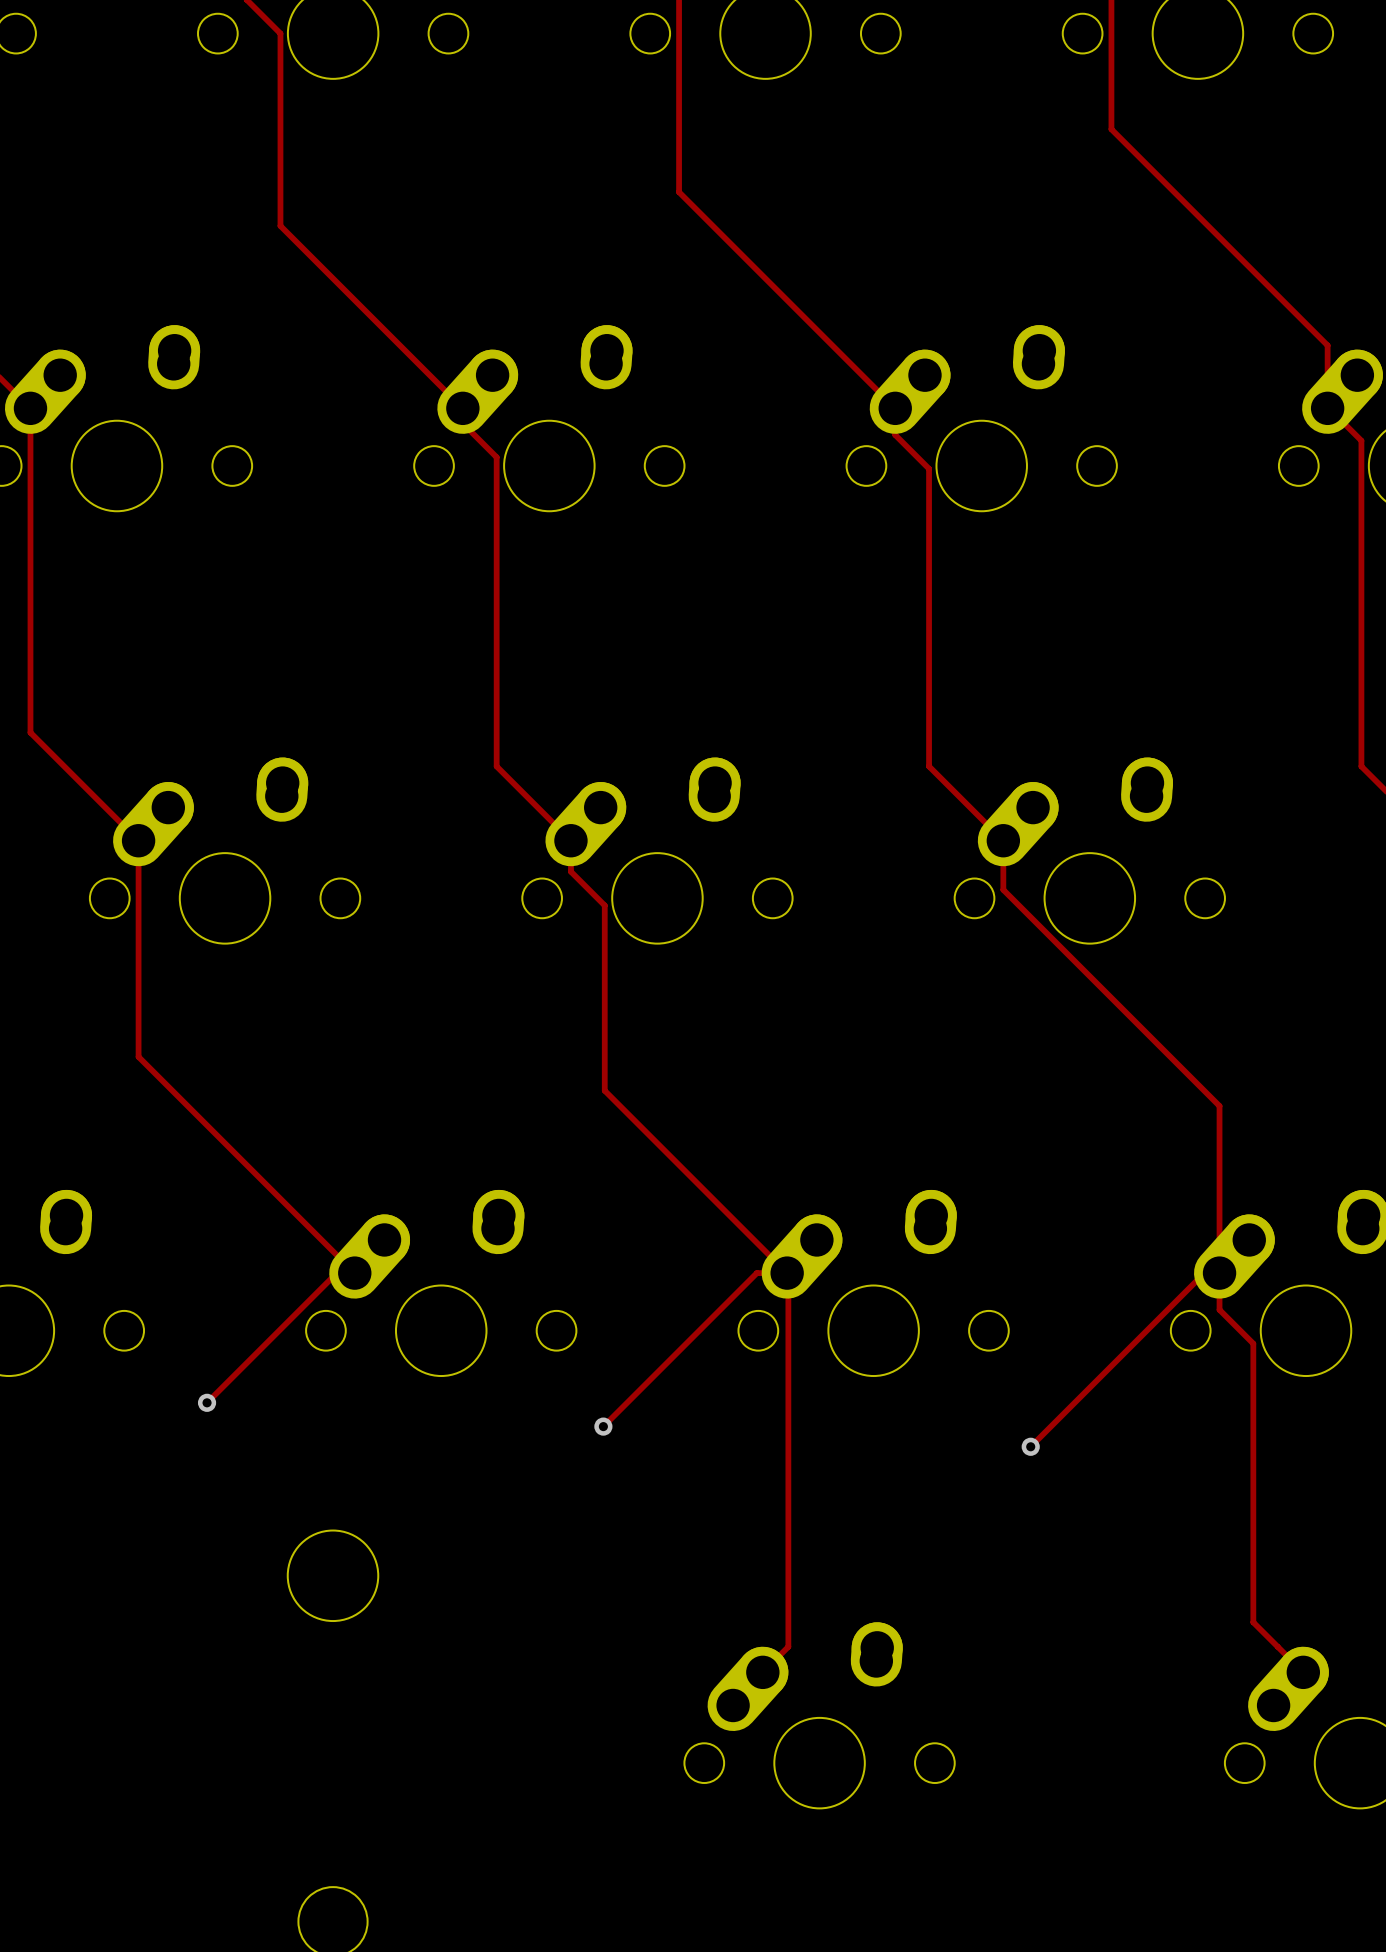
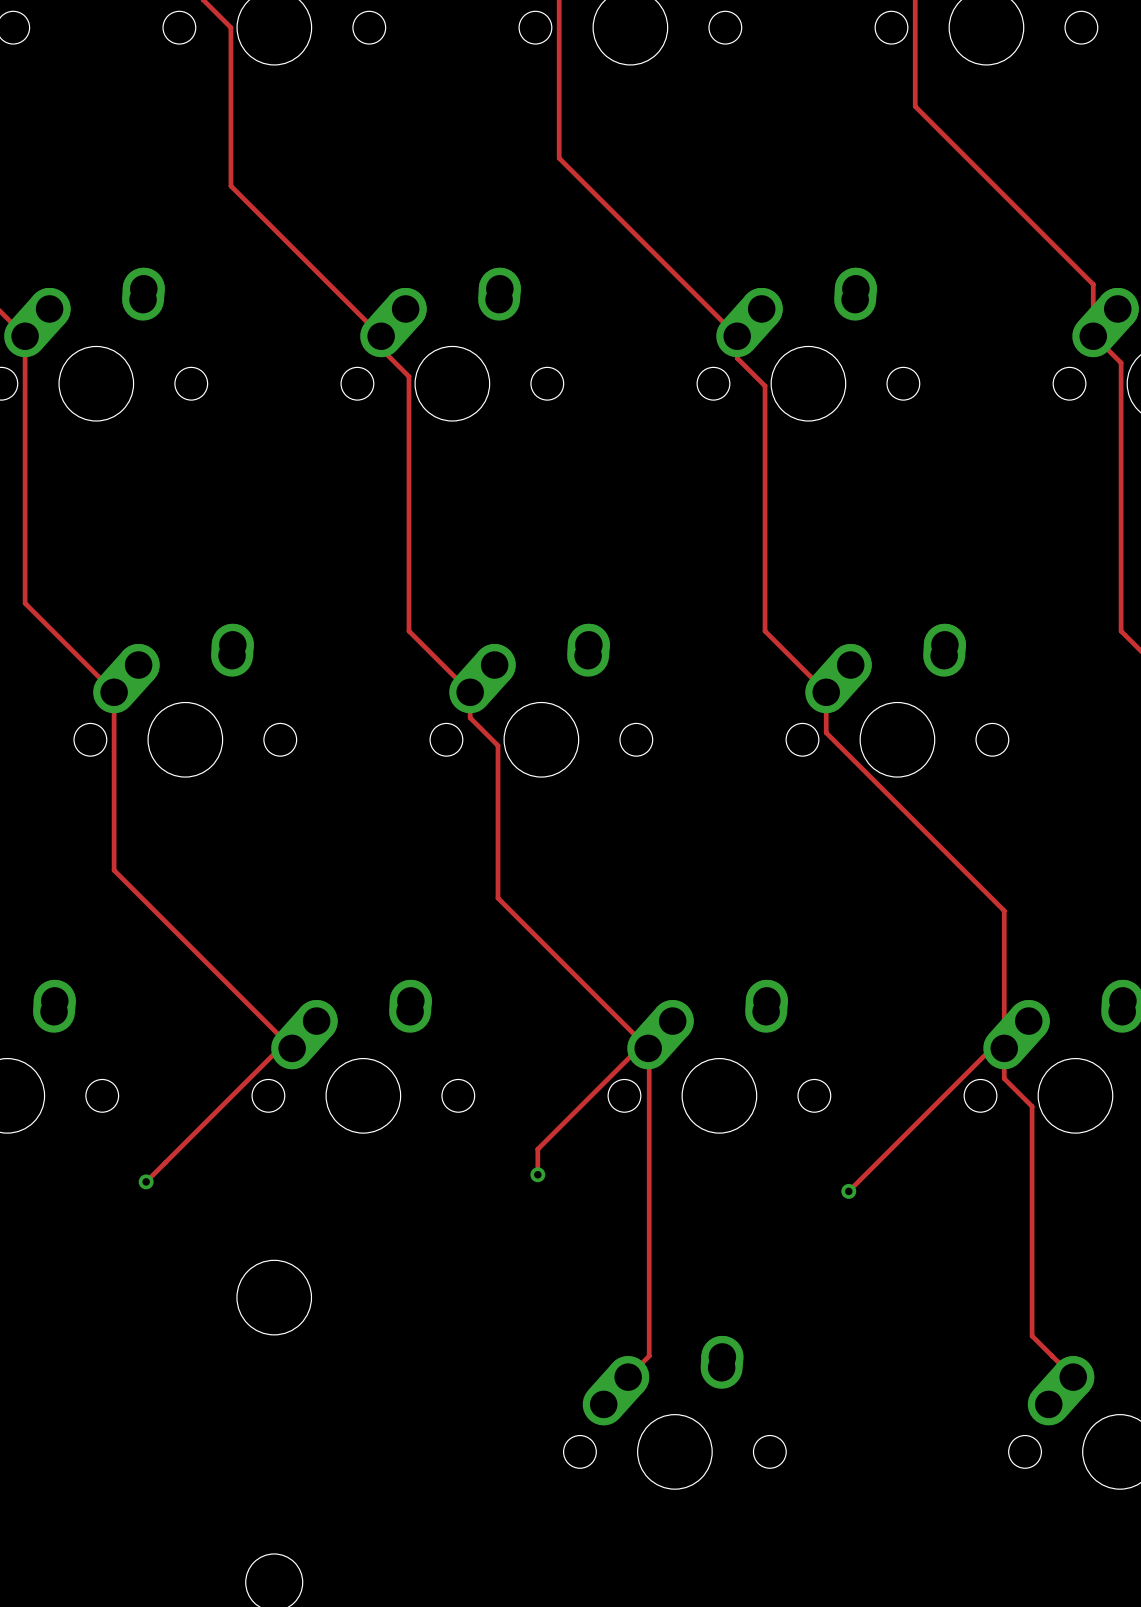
track: (339, 1273) (336, 1273) (207, 1402) -> (279, 1048) (146, 1181)
track: (775, 1273) (756, 1273) (603, 1426) -> (638, 1048) (537, 1149) (537, 1174)
via position: (207, 1402) -> (146, 1181)
via position: (603, 1426) -> (537, 1174)

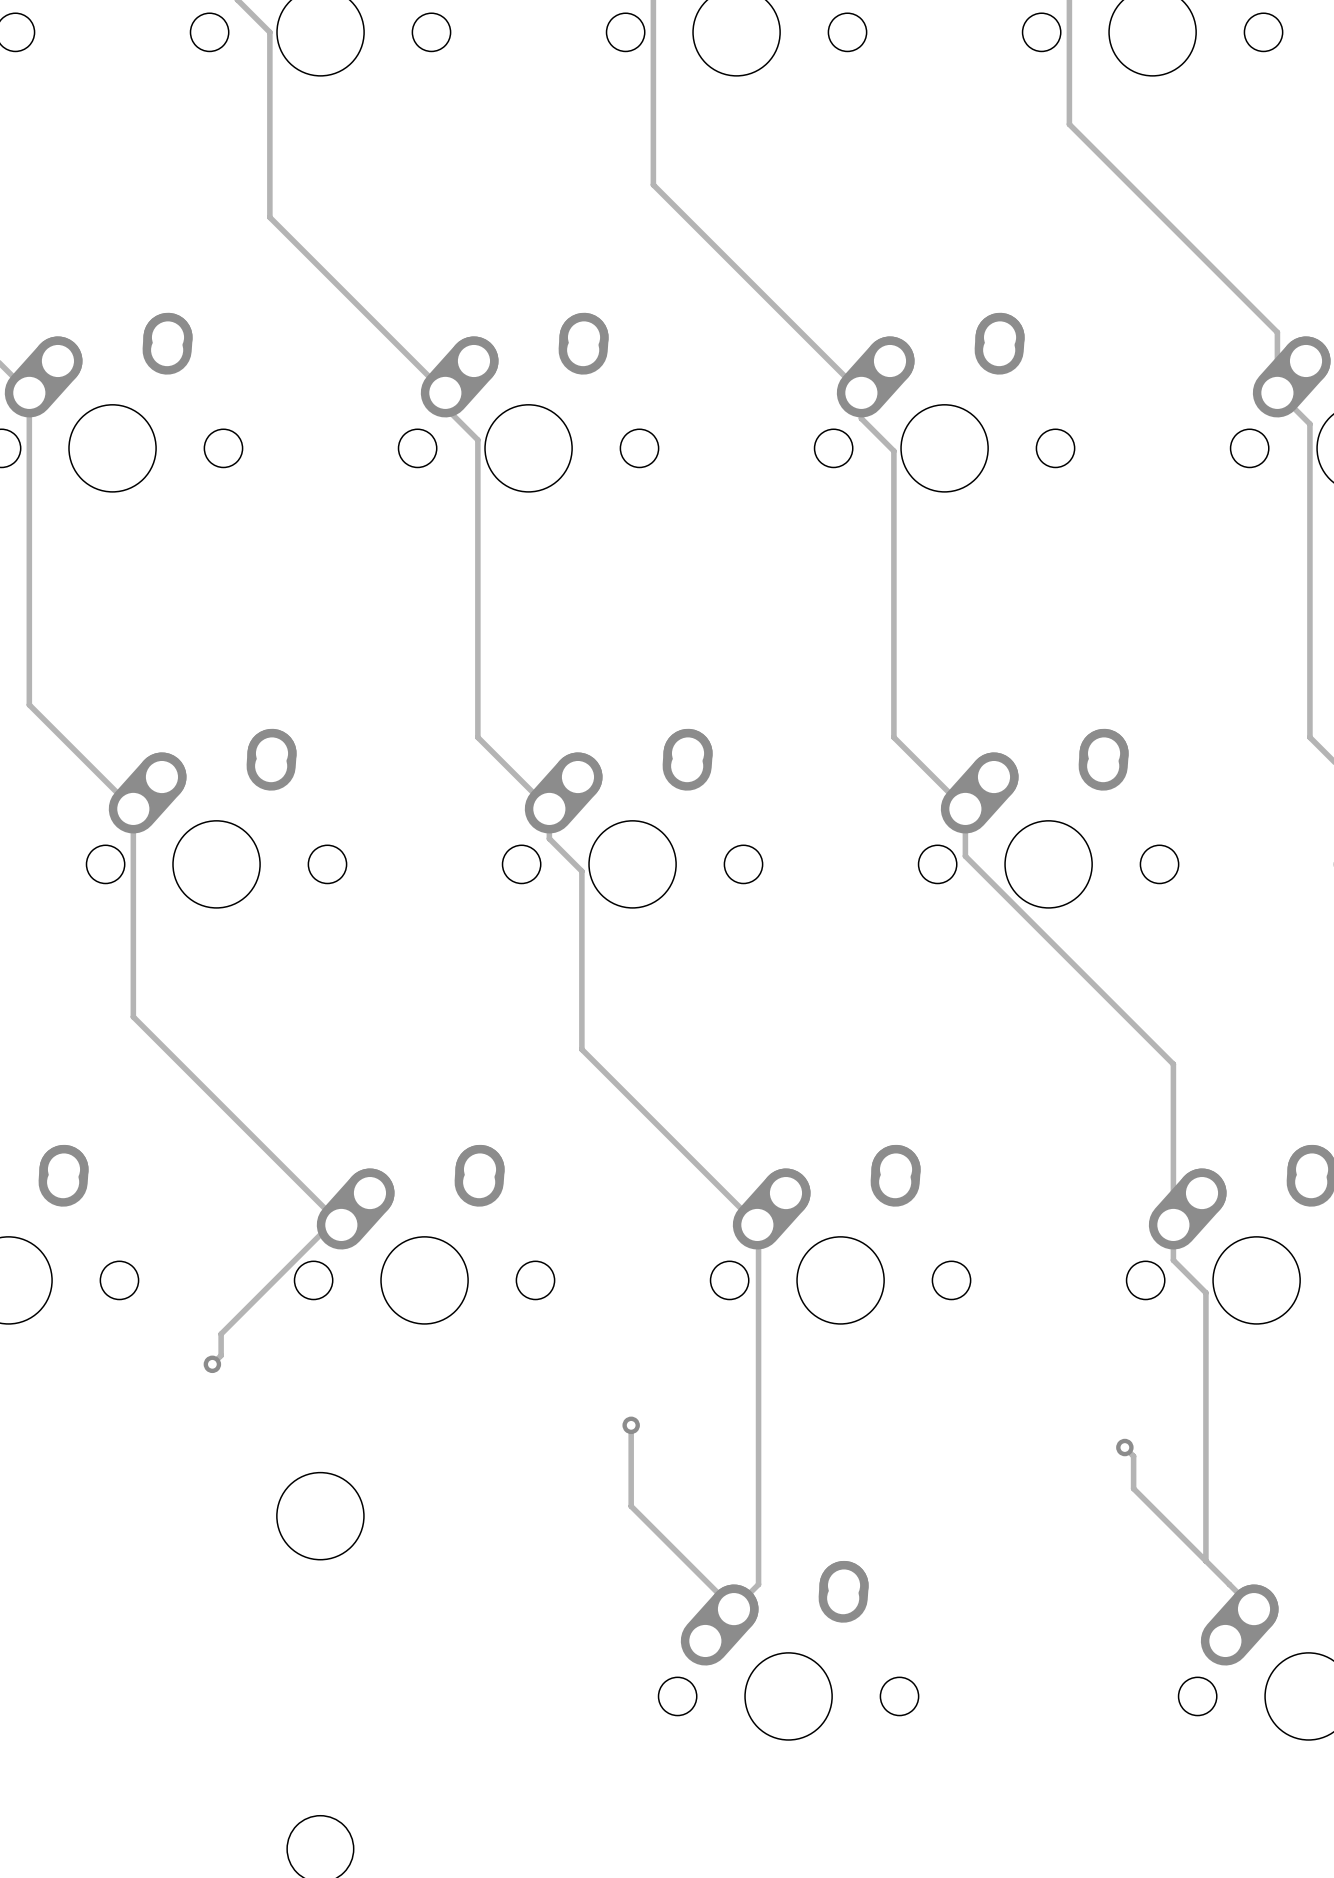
track: (282, 1048) (279, 1048) (146, 1181) -> (330, 1224) (221, 1334) (221, 1355) (212, 1364)
track: (648, 1048) (638, 1048) (537, 1149) (537, 1174) -> none
track: (1004, 1048) (991, 1048) (848, 1191) -> none
via position: (537, 1174) -> (631, 1425)
via position: (146, 1181) -> (212, 1364)
via: (848, 1191) -> none
track: none -> (631, 1425) (631, 1506) (733, 1609)
track: none -> (1124, 1447) (1133, 1456) (1133, 1488) (1205, 1561)
via: none -> (1124, 1447)

